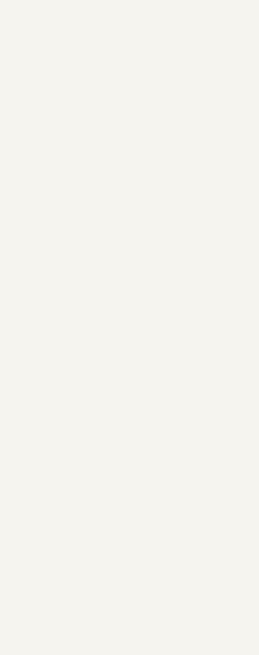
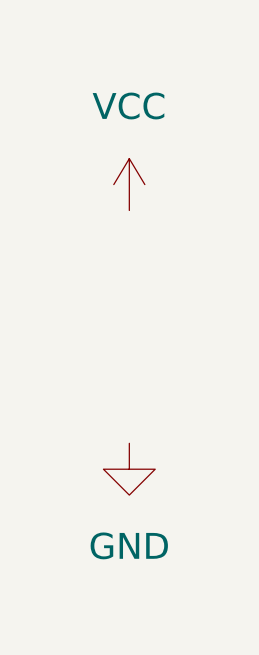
power symbol: none -> VCC (129, 184)
power symbol: none -> GND (129, 469)

